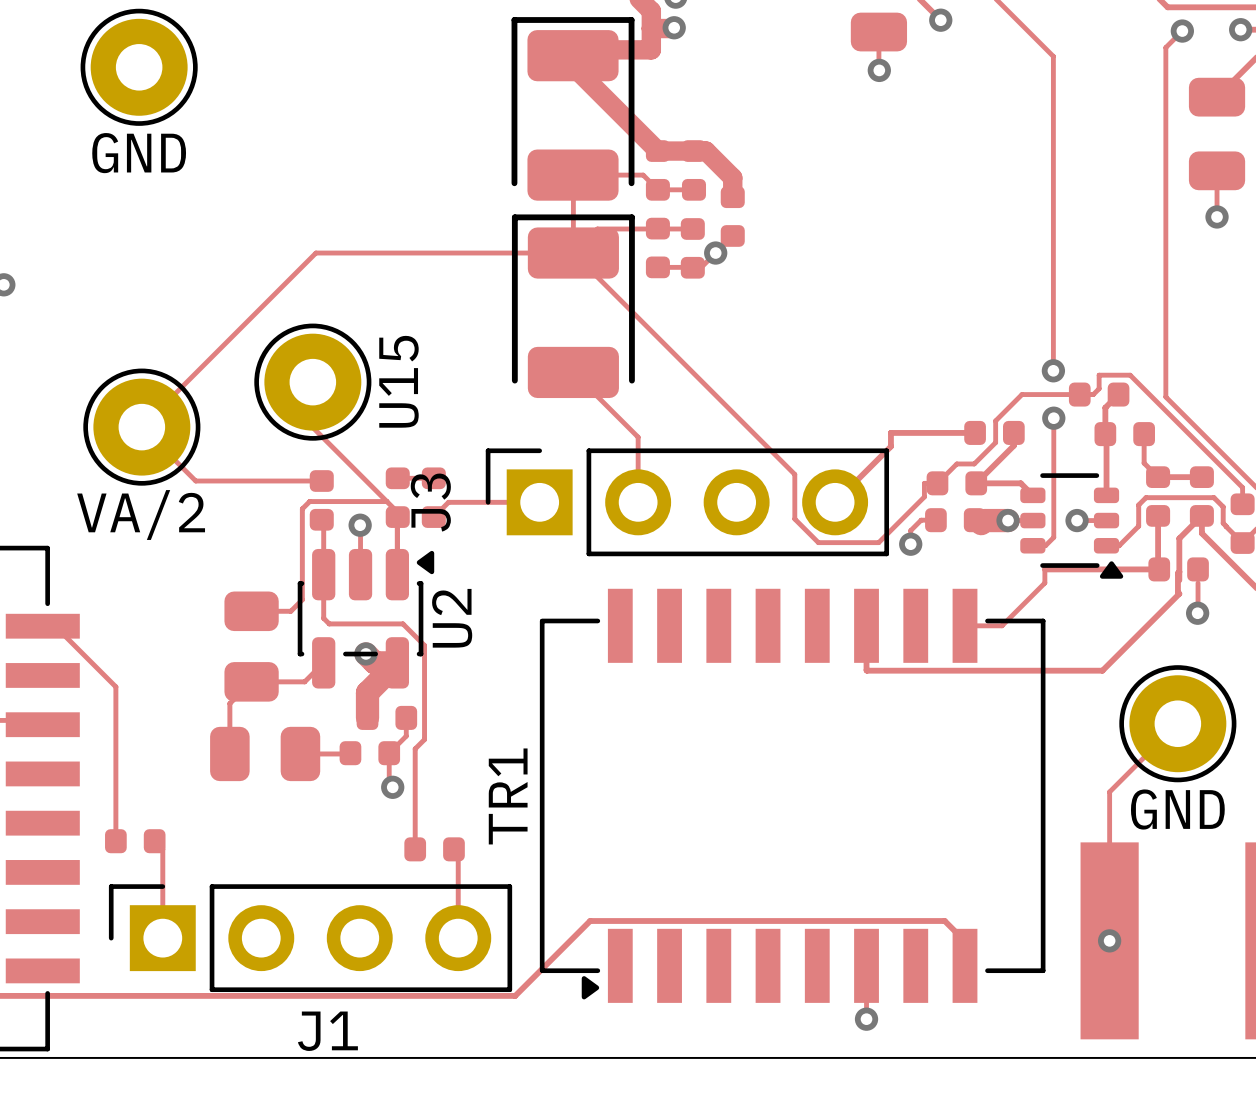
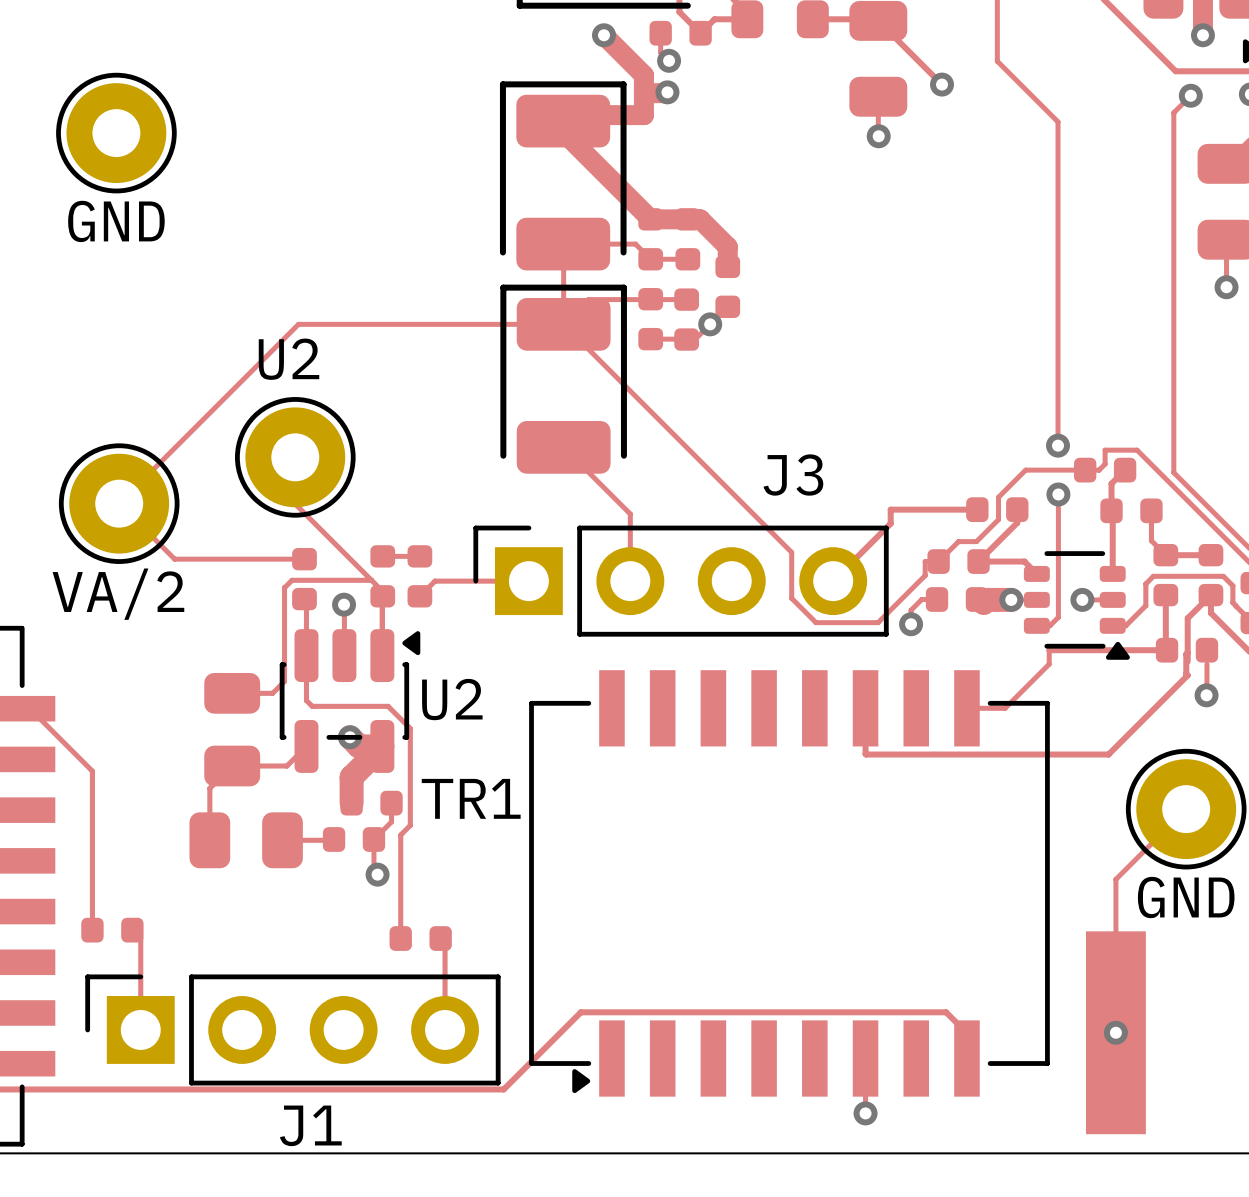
part value: U15 (398, 381) -> U2 (289, 359)
J3 name rotation: 0° (430, 502) -> 90° clockwise (793, 475)
J3 name position: J3 (430, 502) -> J3 (793, 475)
U2 name rotation: 0° (452, 618) -> 90° clockwise (452, 699)
TR1 name rotation: 0° (508, 796) -> 90° clockwise (471, 798)

